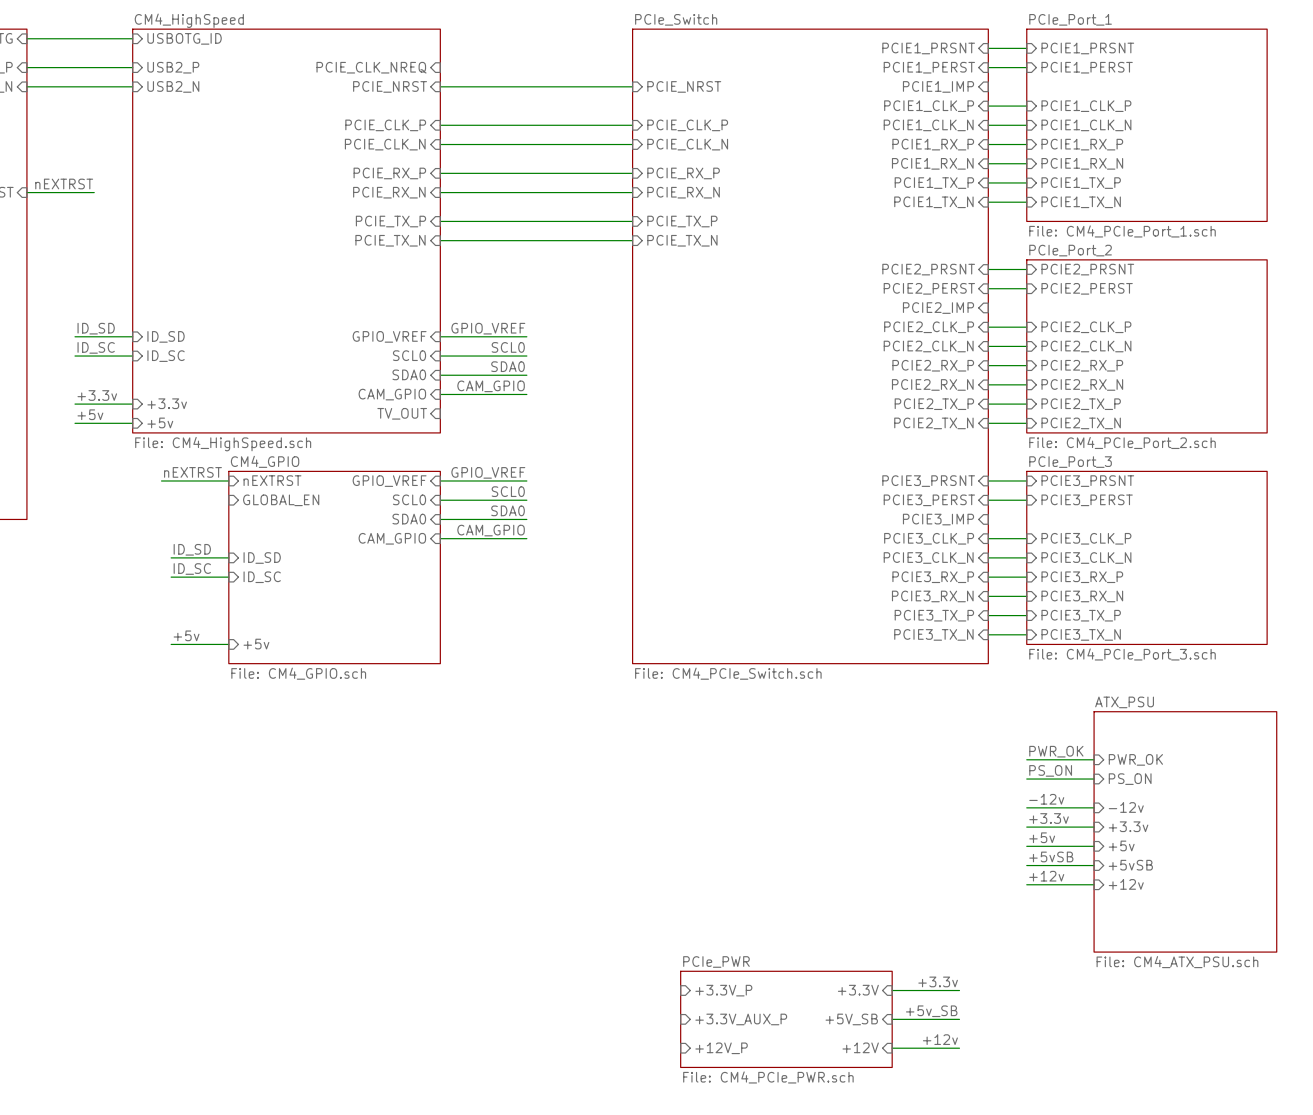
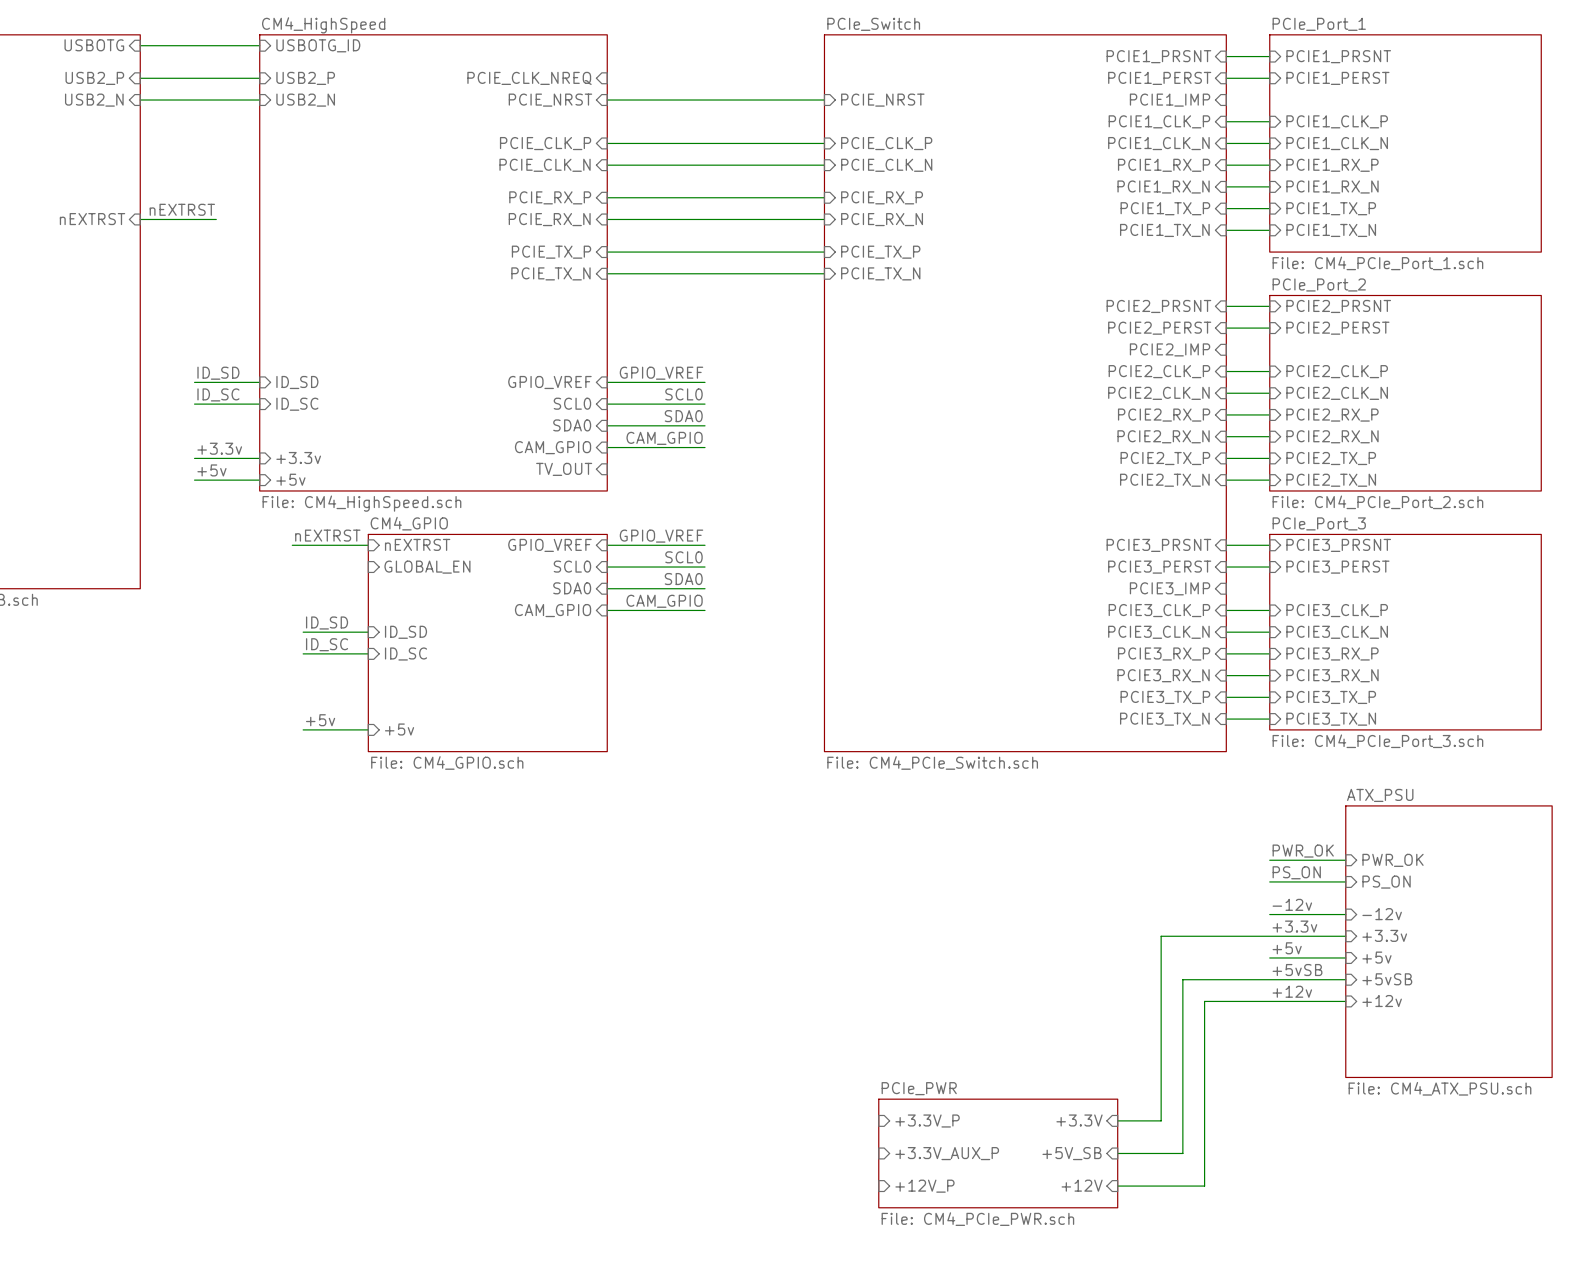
wire: none -> (1269, 1001) (1204, 1001) (1204, 1186) (1193, 1186)
label: +3.3v (938, 981) -> none
wire: (930, 990) (959, 990) -> (1161, 1120) (1161, 936) (1269, 936)
label: +5v_SB (931, 1011) -> none
wire: (949, 1019) (959, 1019) -> (1182, 1153) (1182, 979) (1269, 979)
label: +12v (940, 1039) -> none

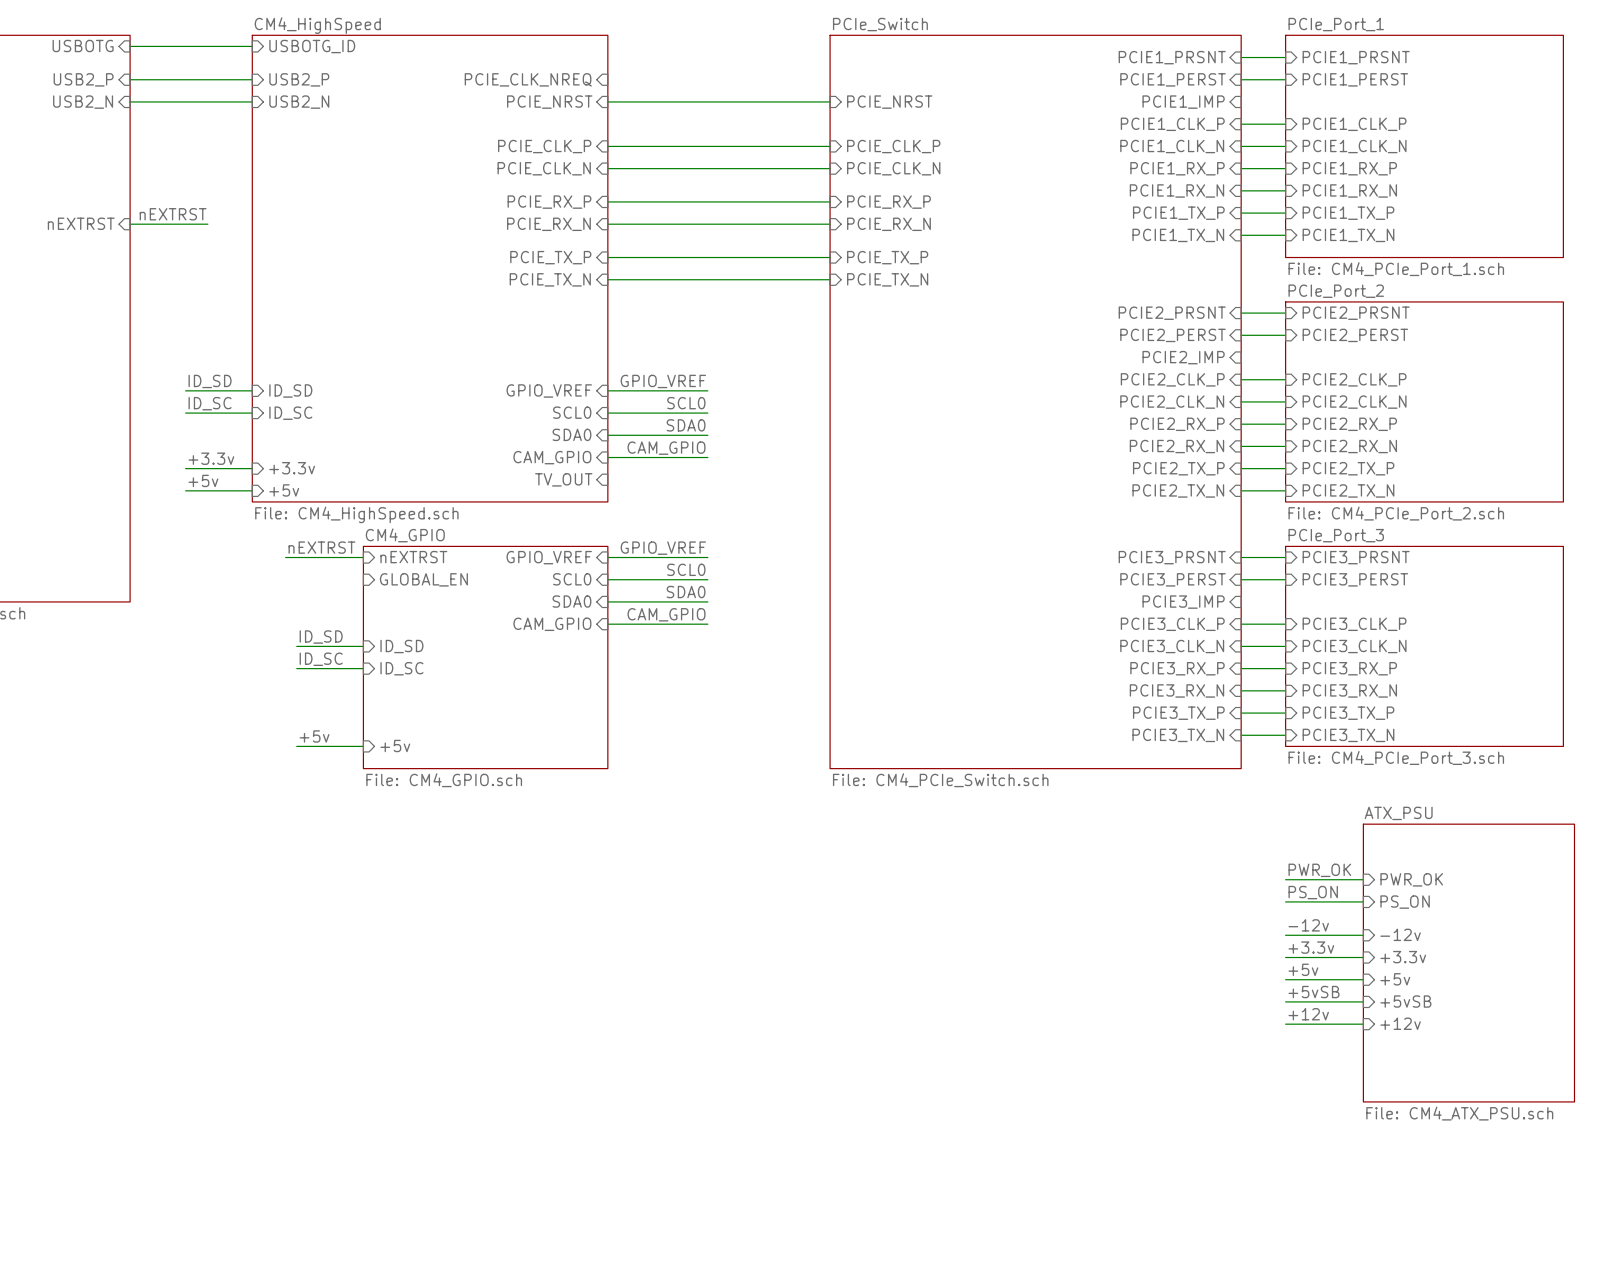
wire: (1269, 936) (1161, 936) (1161, 1120) (1117, 1120) -> none
wire: (1269, 979) (1182, 979) (1182, 1153) (1117, 1153) -> none
wire: (1269, 1001) (1204, 1001) (1204, 1186) (1117, 1186) -> none
sheet pin: +3.3V (1079, 1120) -> none
sheet pin: +3.3V_P (927, 1121) -> none
sheet pin: +3.3V_AUX_P (947, 1153) -> none
sheet PCIe_PWR: File: CM4_PCIe_PWR.sch (998, 1153) -> none
sheet pin: +5V_SB (1072, 1153) -> none
sheet pin: +12V (1082, 1185) -> none
sheet pin: +12V_P (924, 1186) -> none

